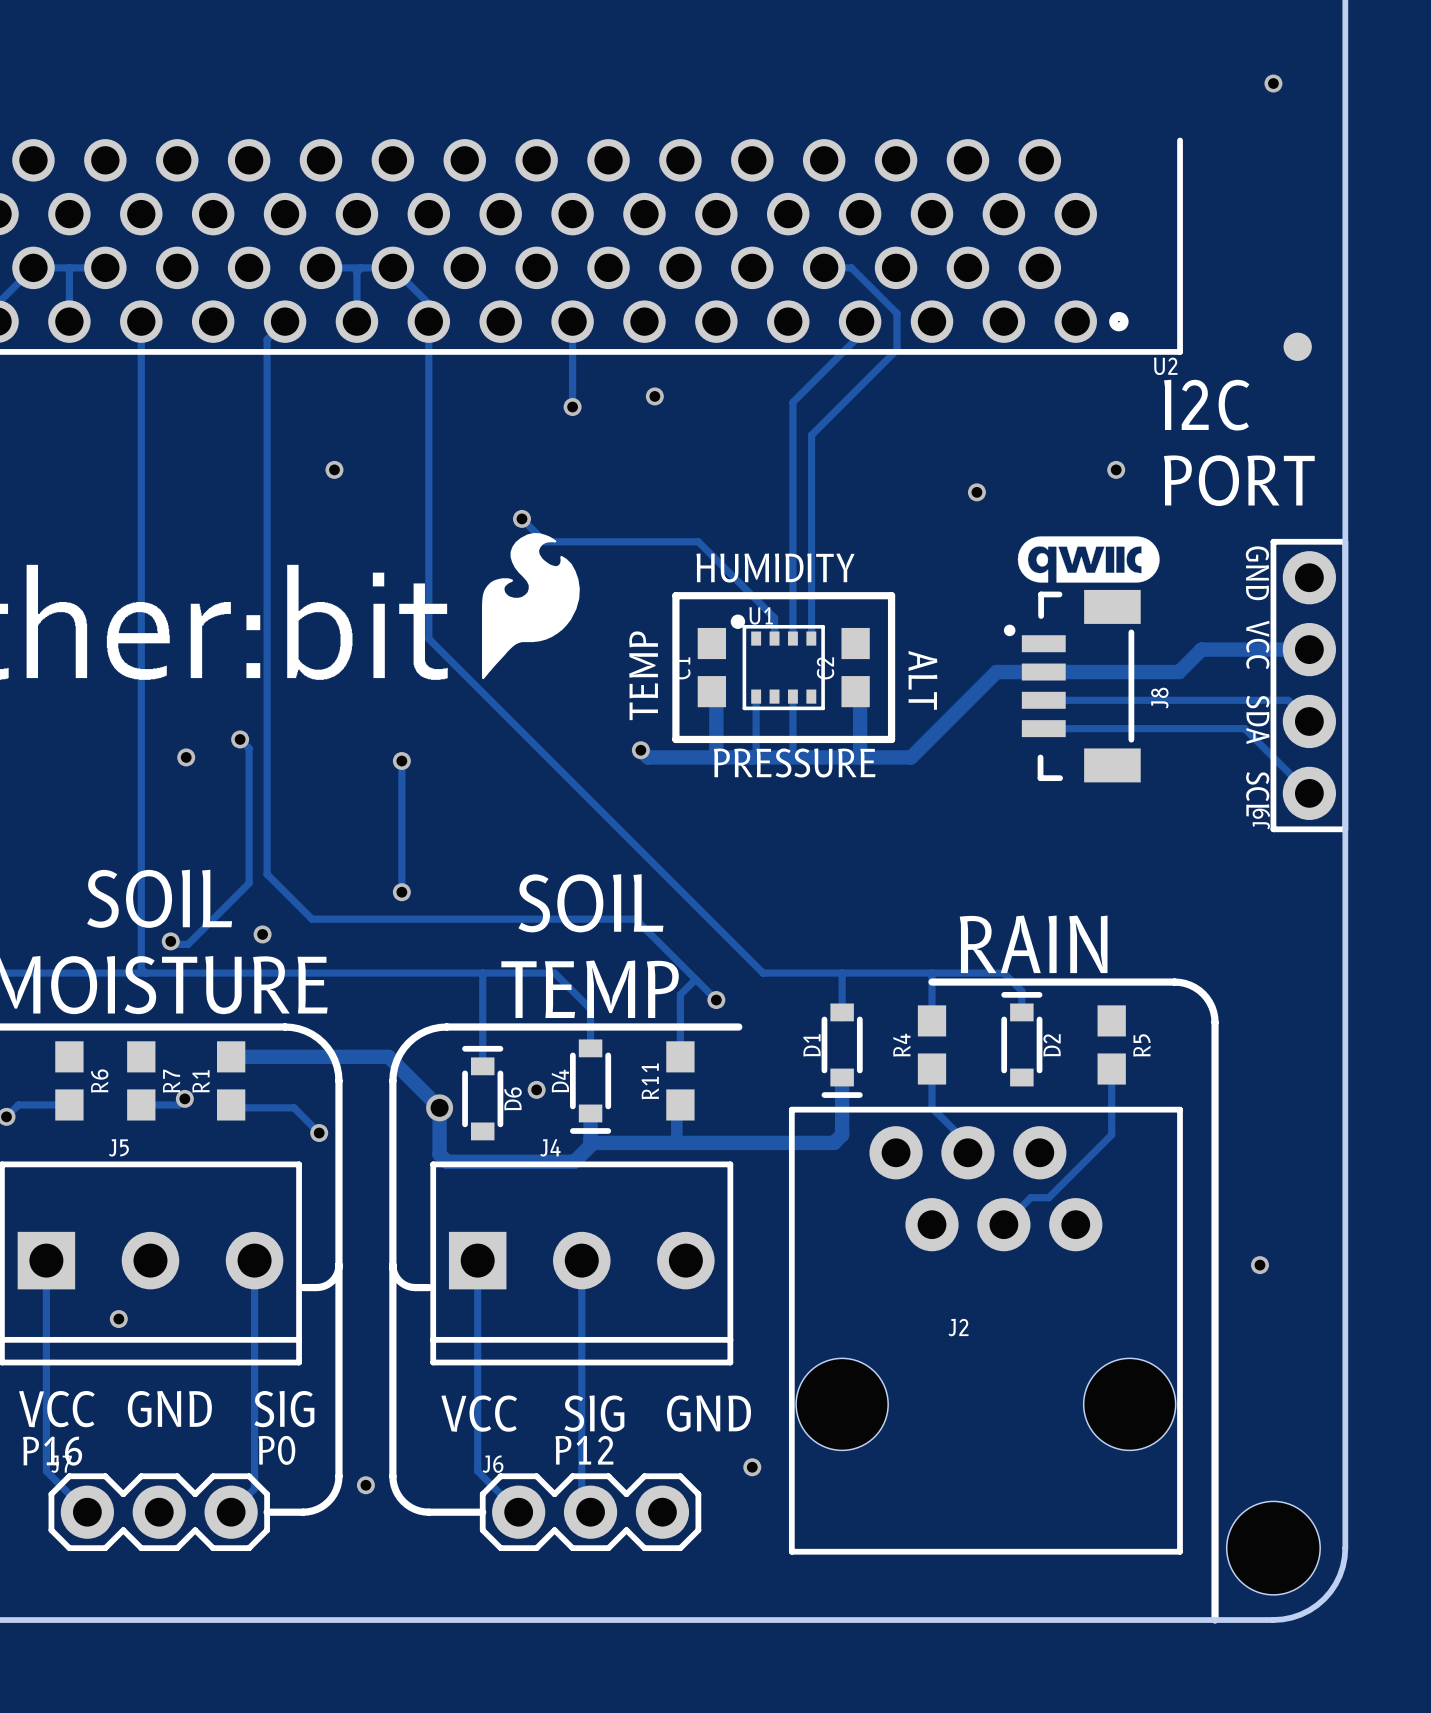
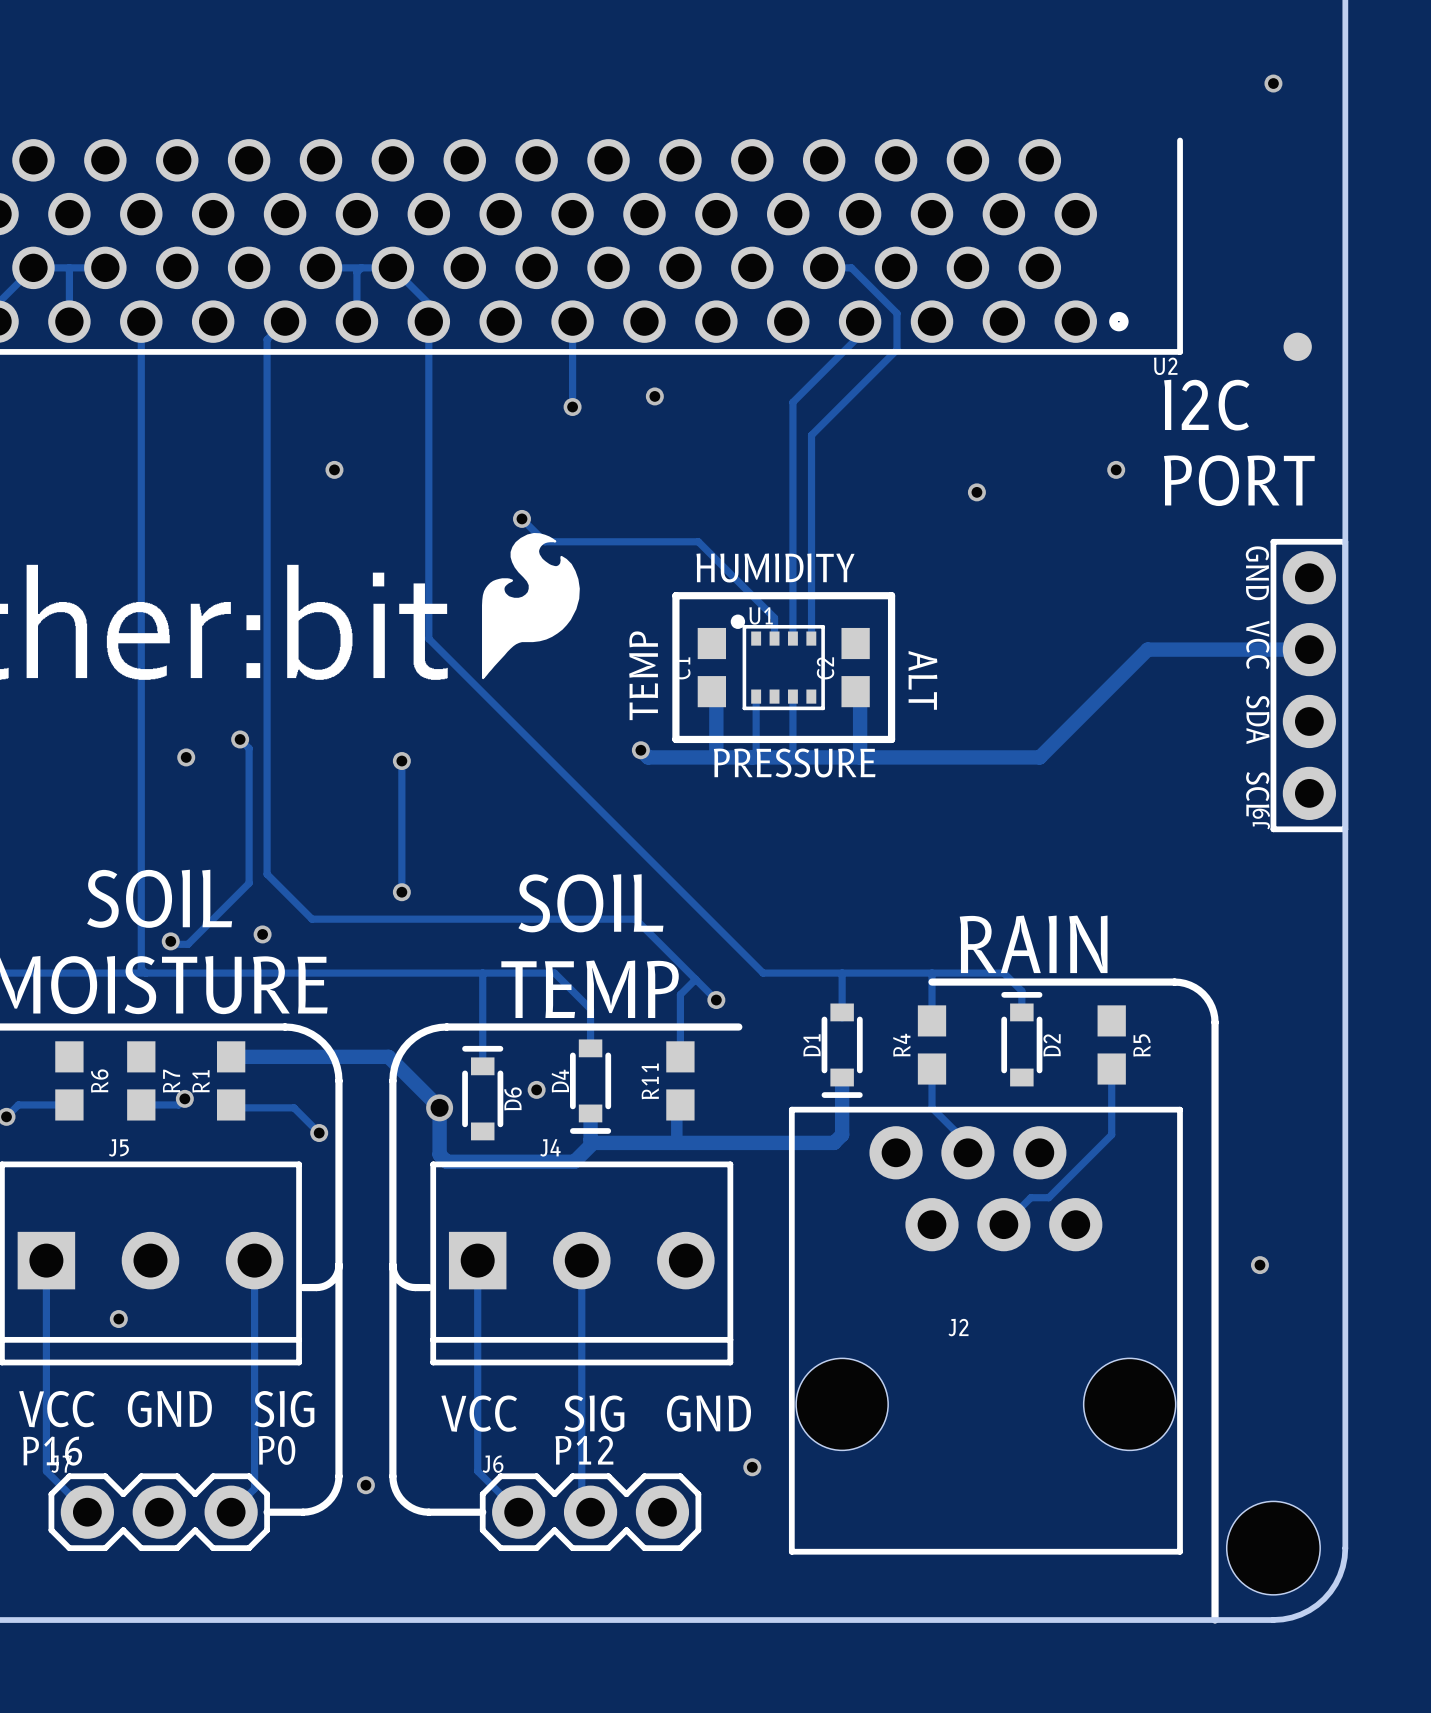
drawing: [1017, 536, 1160, 583] -> none
track: (1201, 649) (1179, 672) (996, 672) (911, 757) -> (1201, 649) (1147, 649) (1039, 757) (911, 757)
J8: (1072, 686) -> none
track: (1043, 700) (1288, 700) (1309, 721) -> none
track: (1043, 728) (1244, 728) (1309, 793) -> none

